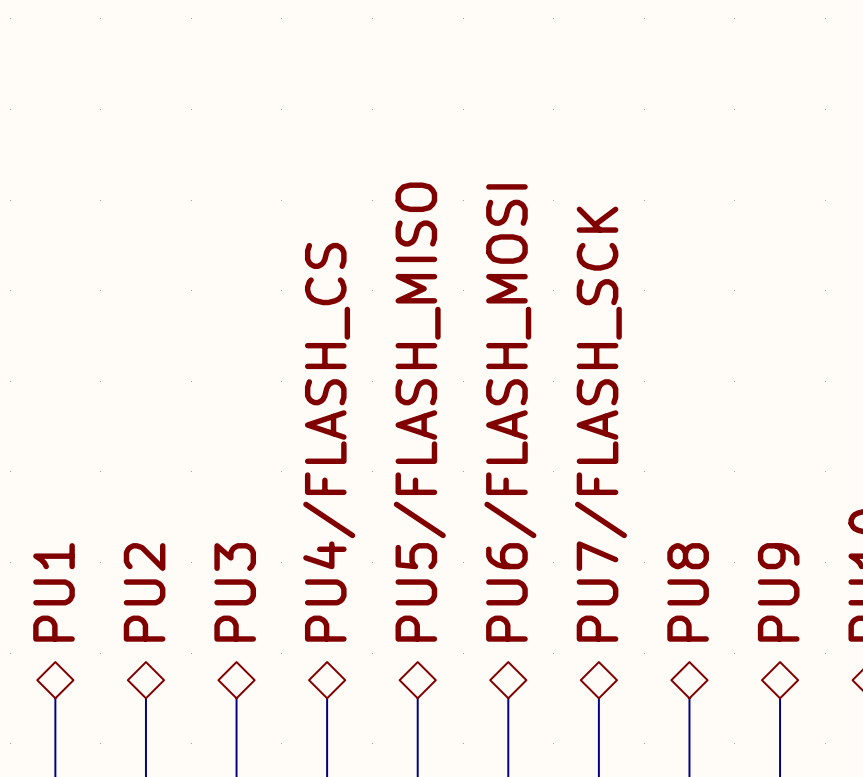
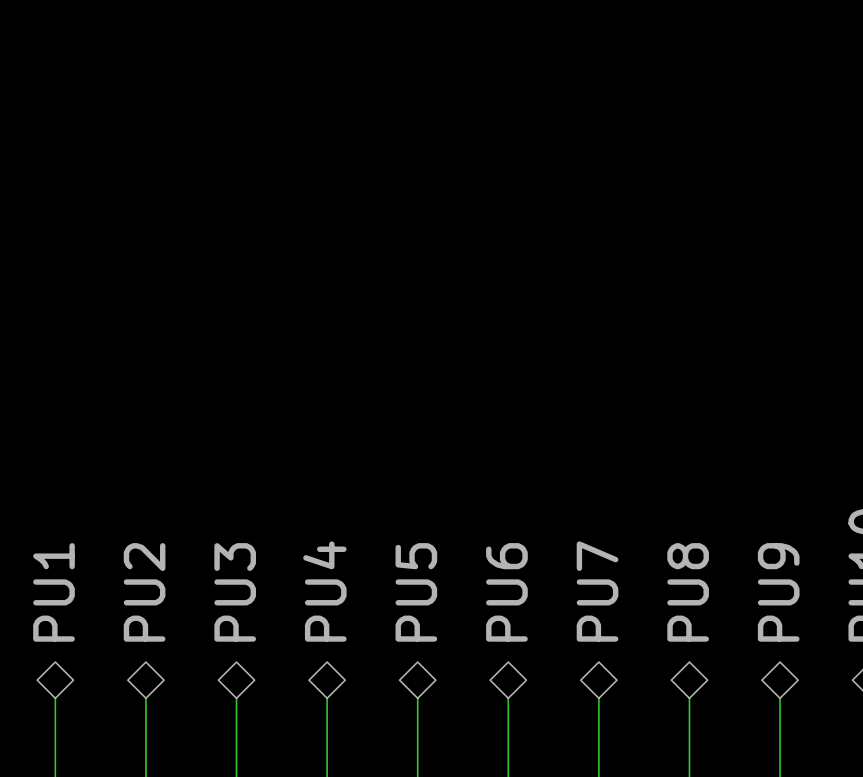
hierarchical label: PU5/FLASH_MISO (419, 412) -> PU5 (416, 592)
hierarchical label: PU6/FLASH_MOSI (510, 412) -> PU6 (506, 592)
hierarchical label: PU7/FLASH_SCK (600, 424) -> PU7 (597, 591)
hierarchical label: PU4/FLASH_CS (329, 442) -> PU4 (324, 591)

